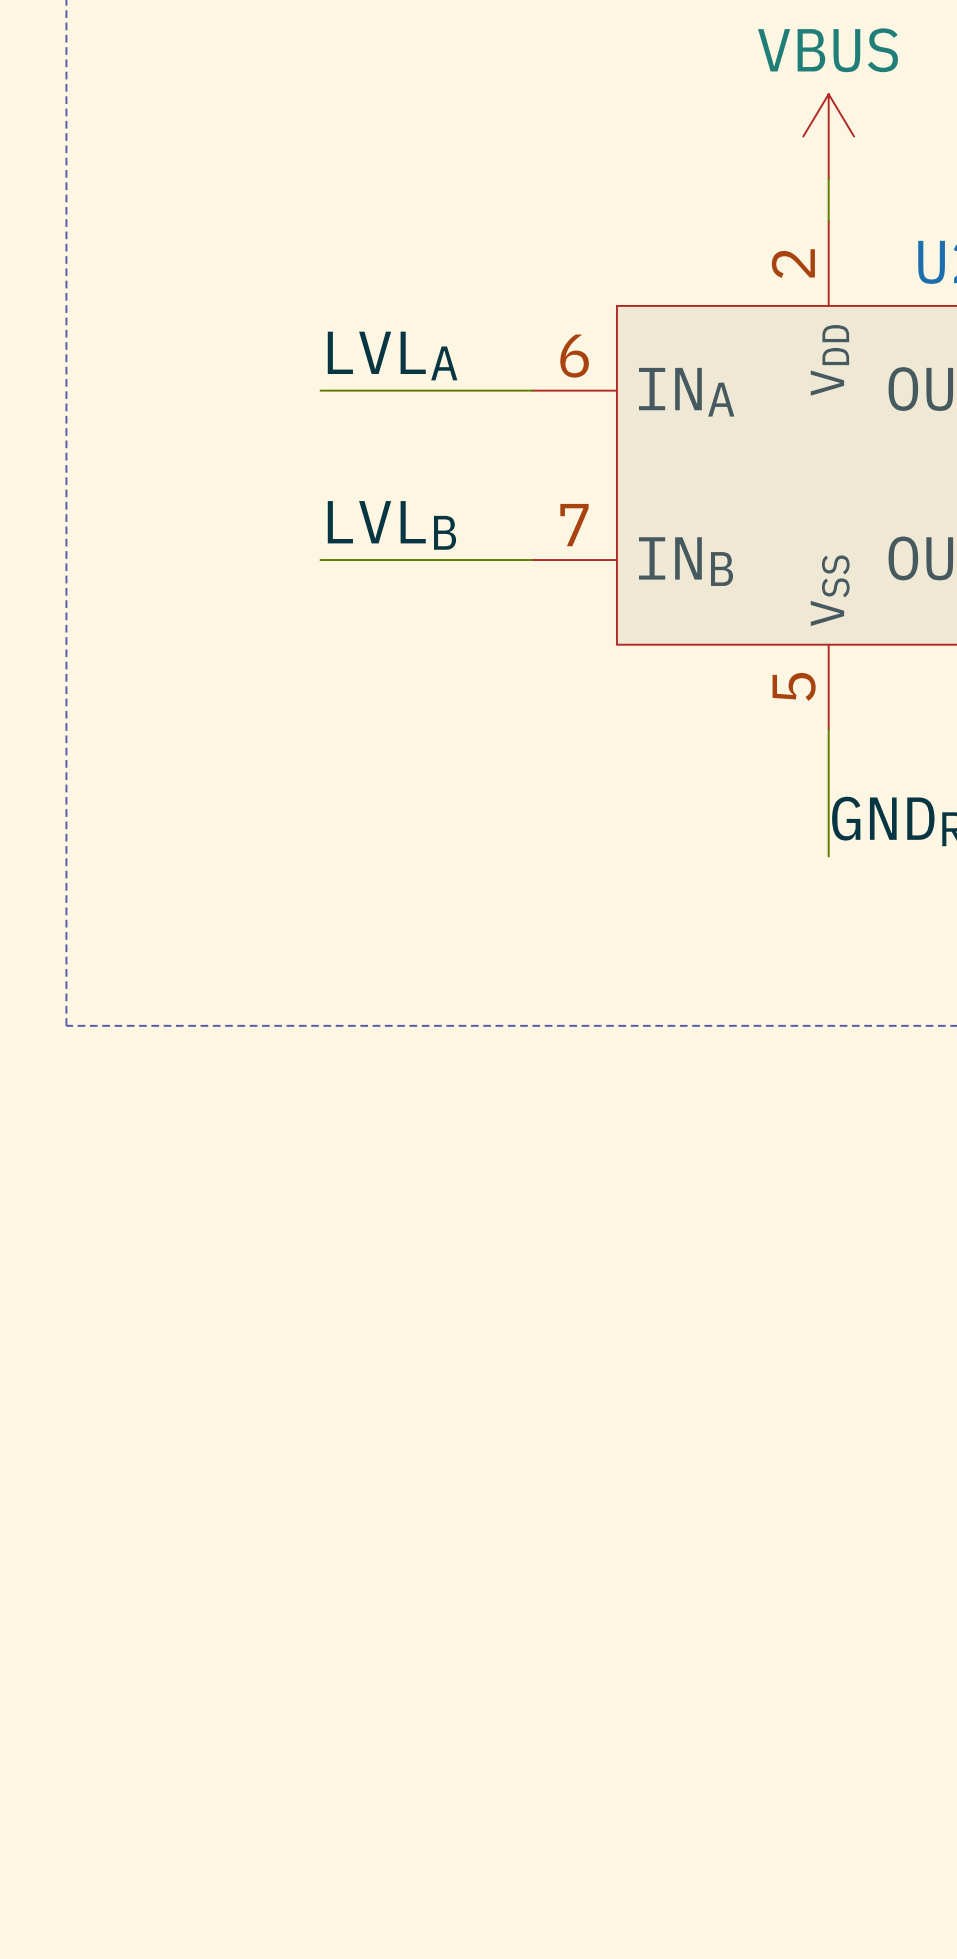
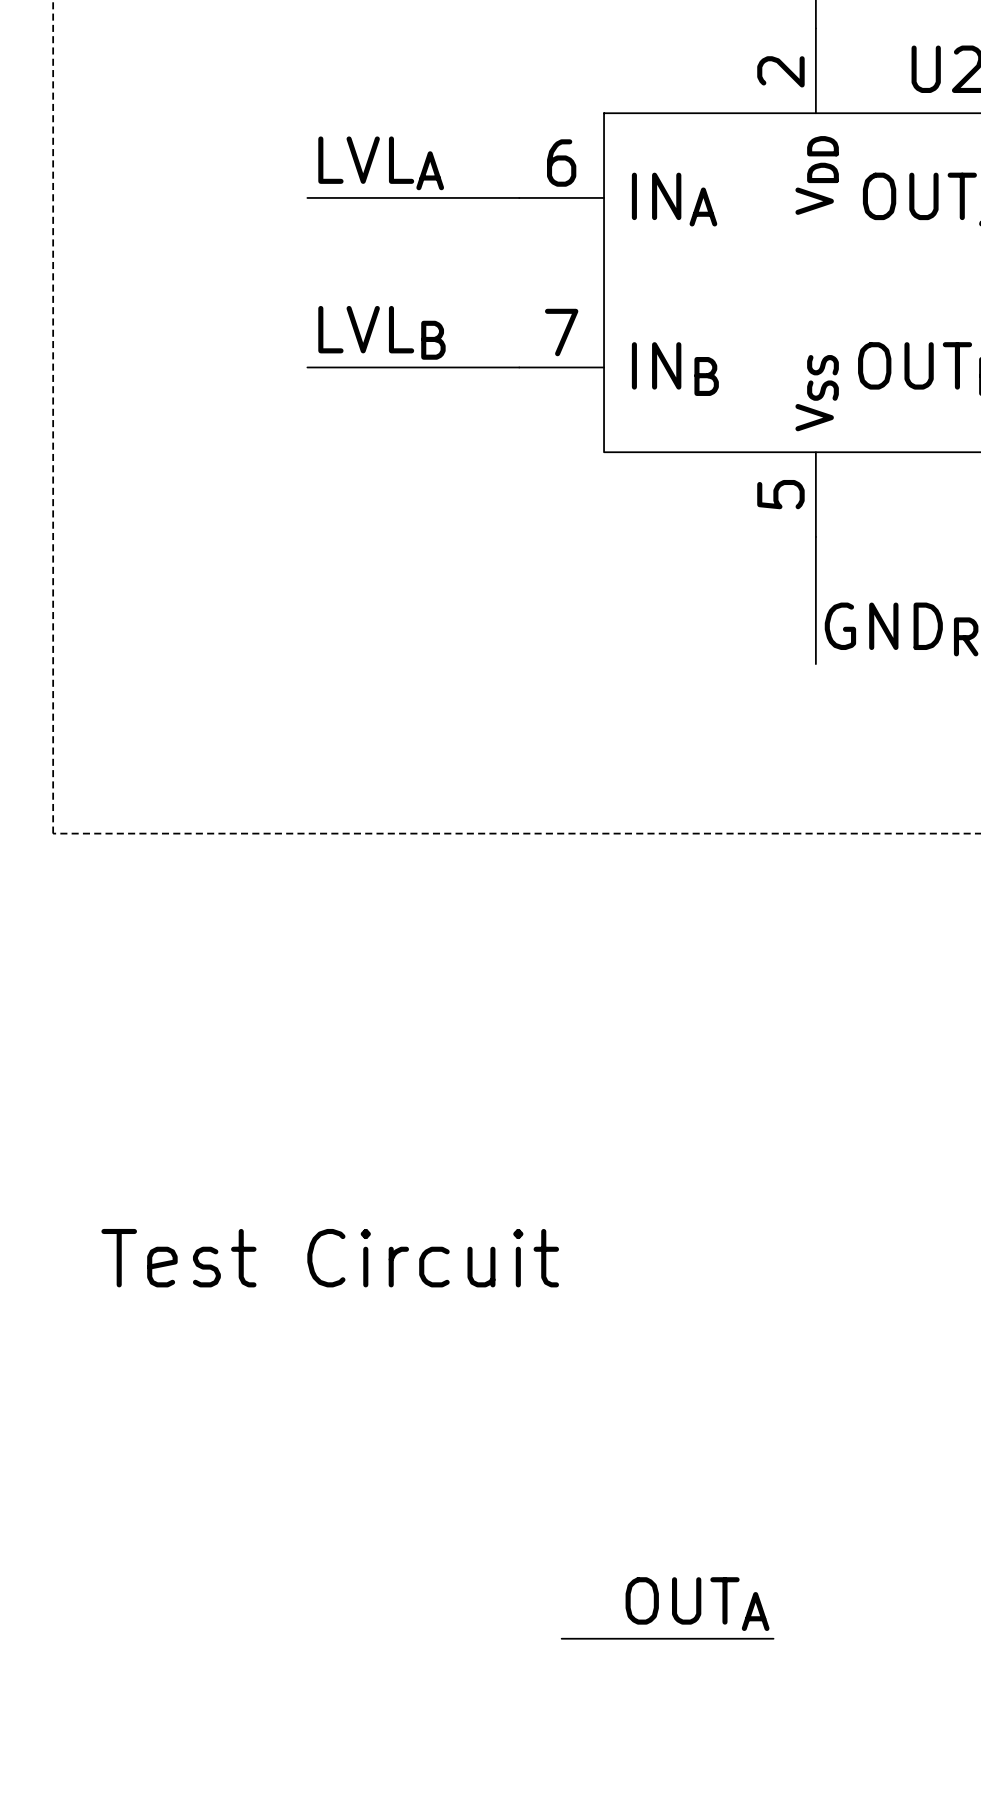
text: none -> Test Circuit (330, 1258)
label: none -> OUTA (697, 1604)
wire: none -> (561, 1638) (773, 1638)

